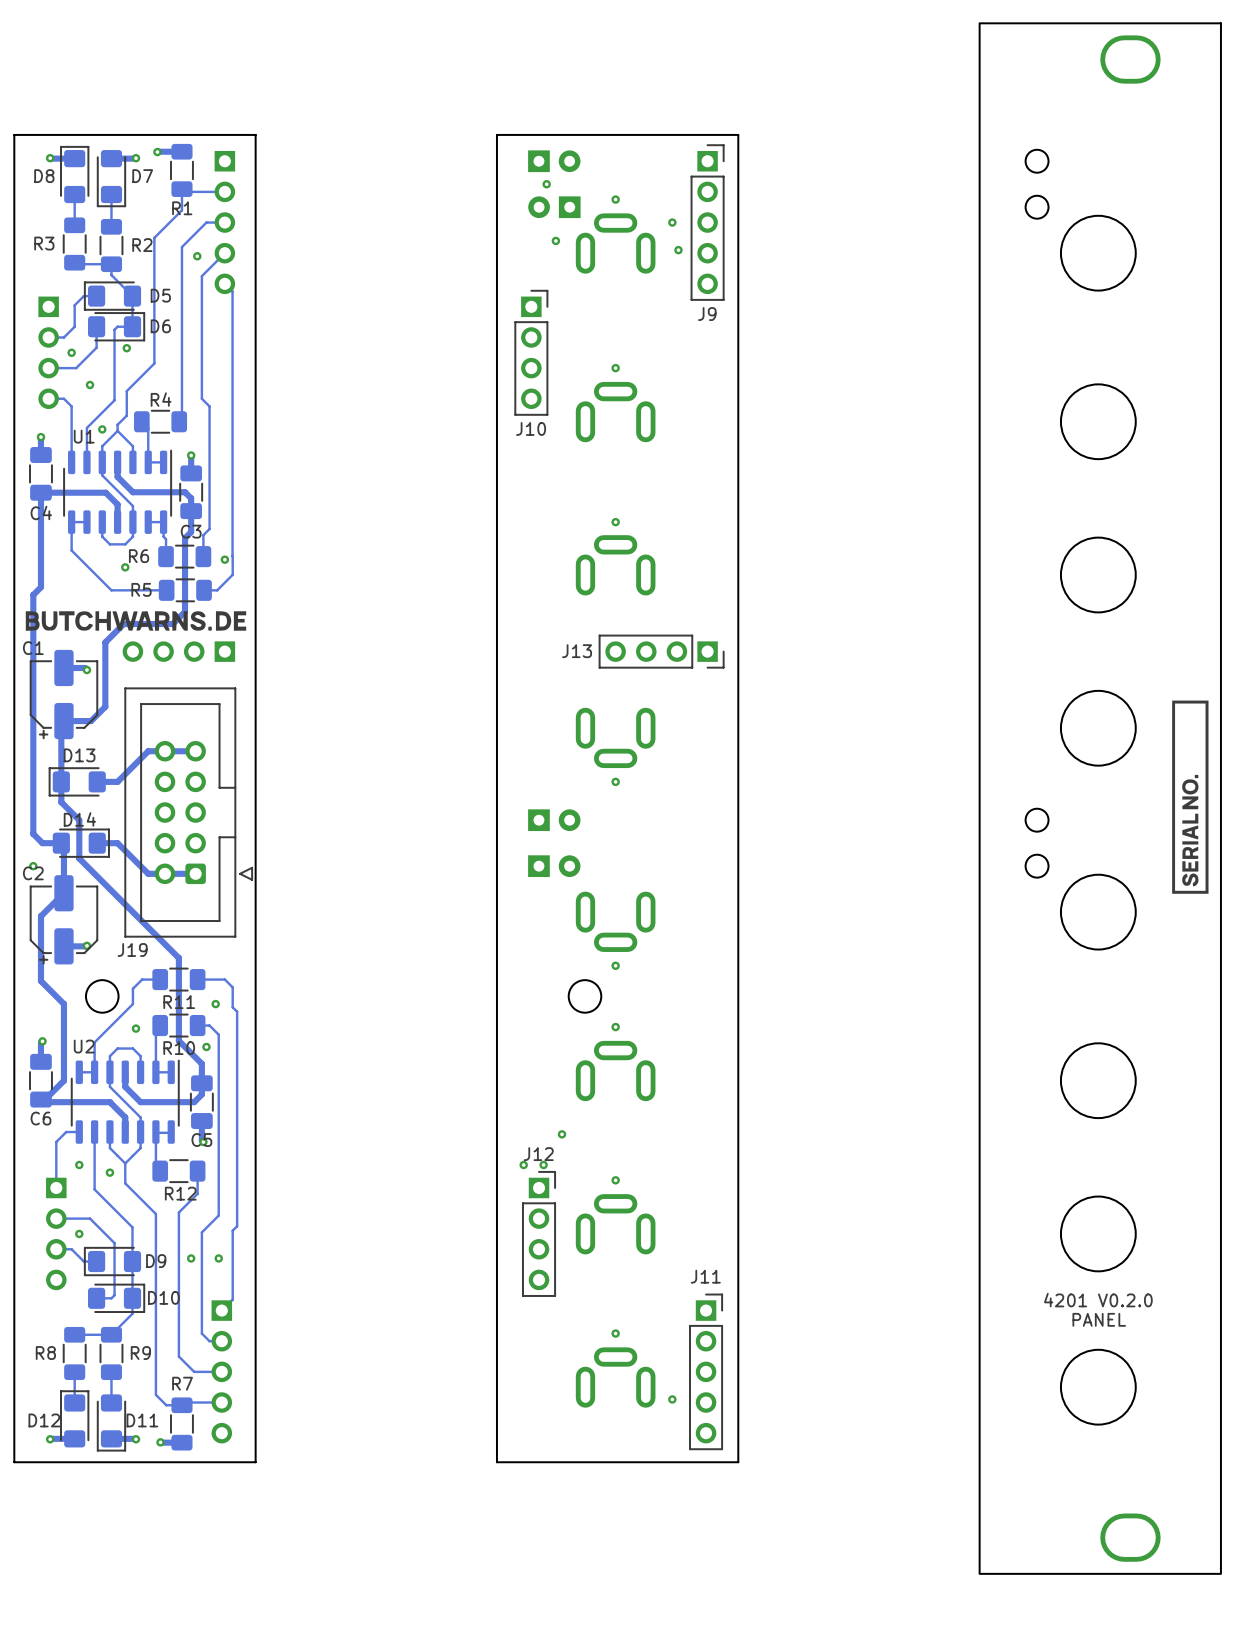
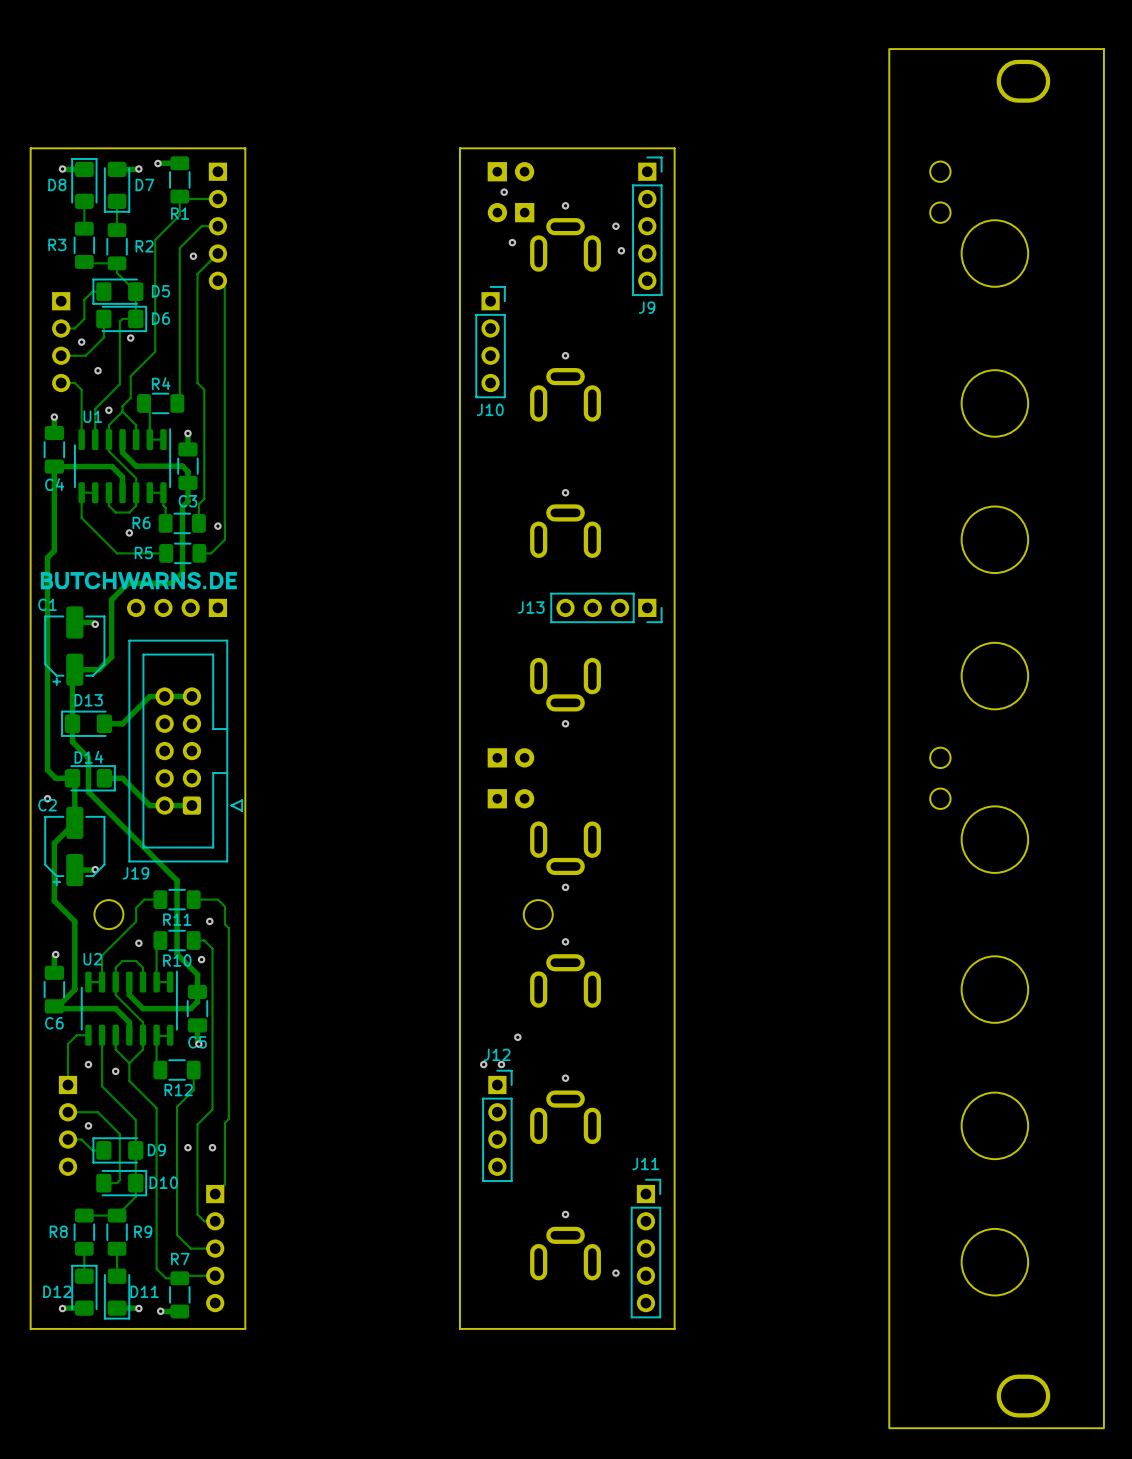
drawing: [1172, 700, 1209, 894] -> none
text: 4201 V0.2.0 (1098, 1300) -> none
text: PANEL (1099, 1319) -> none

